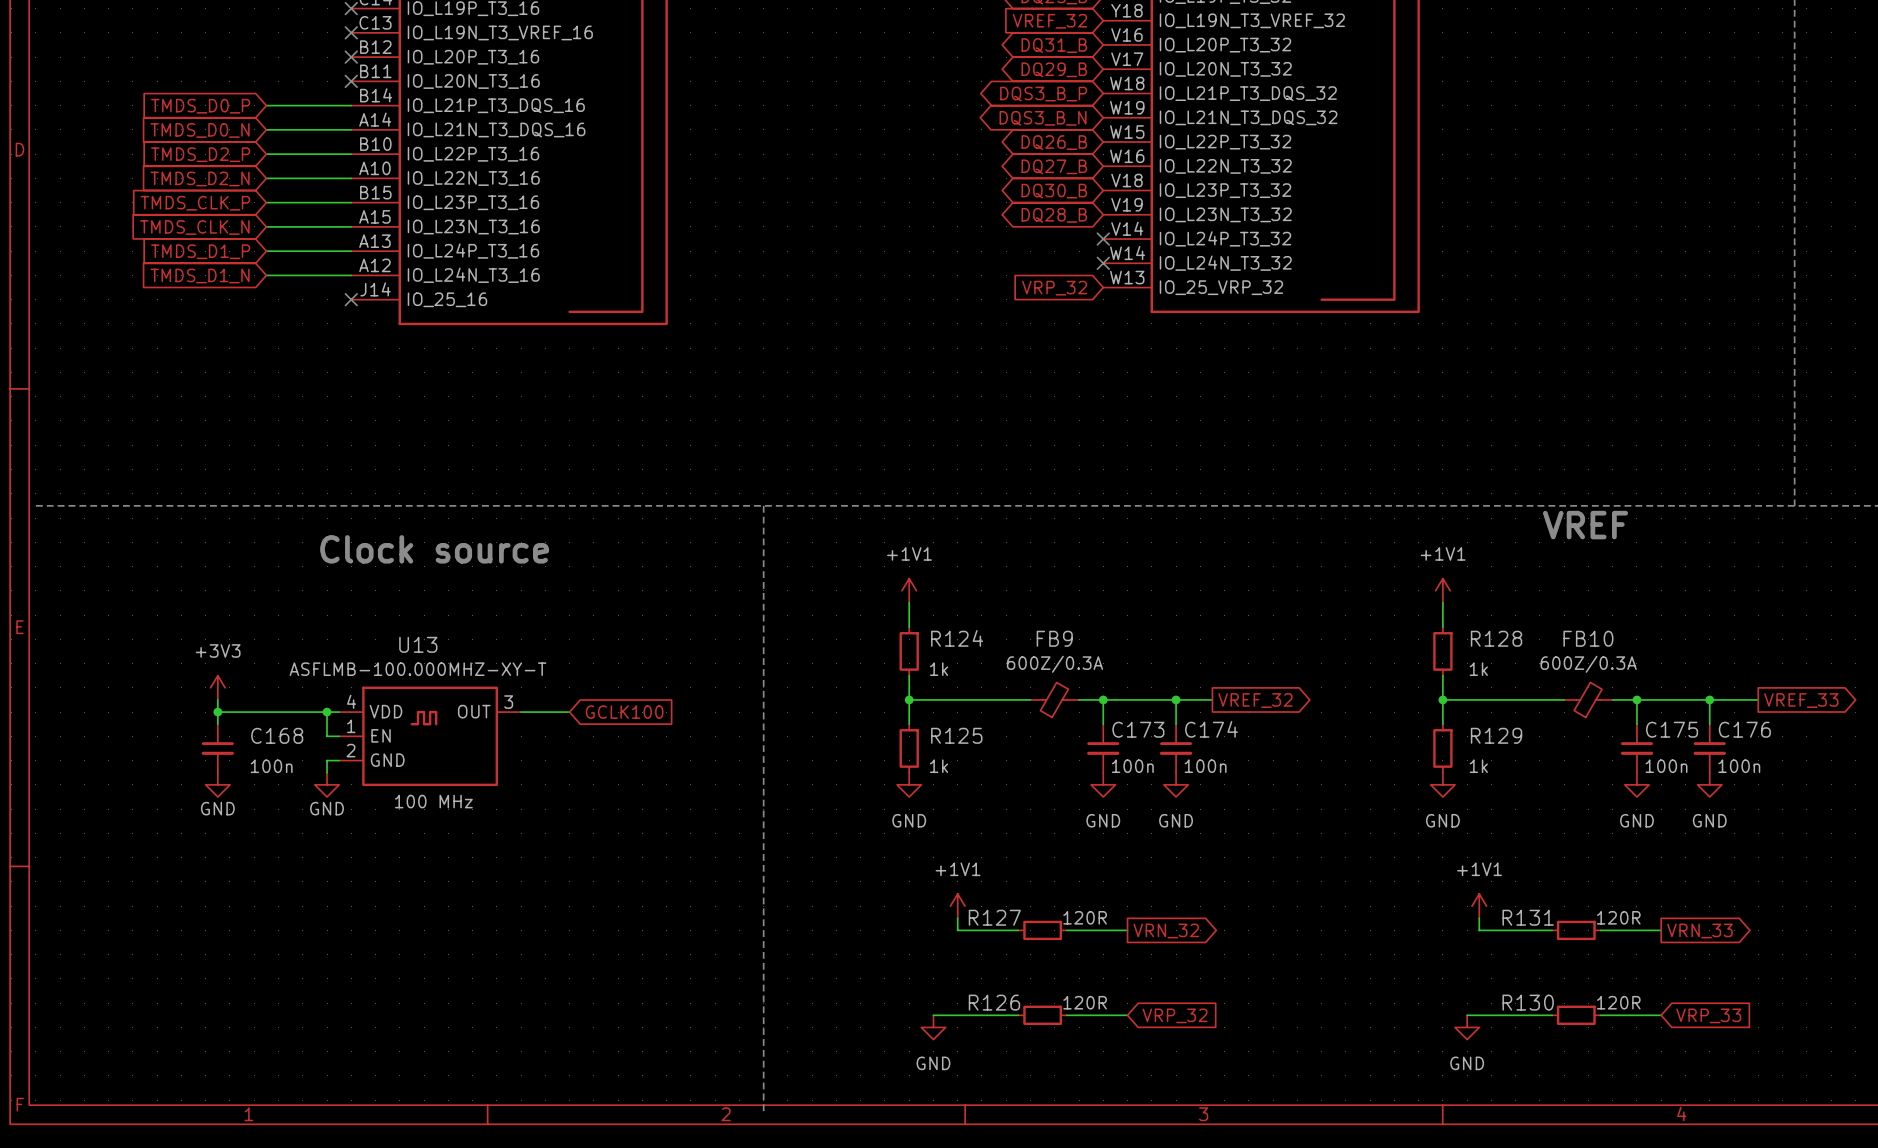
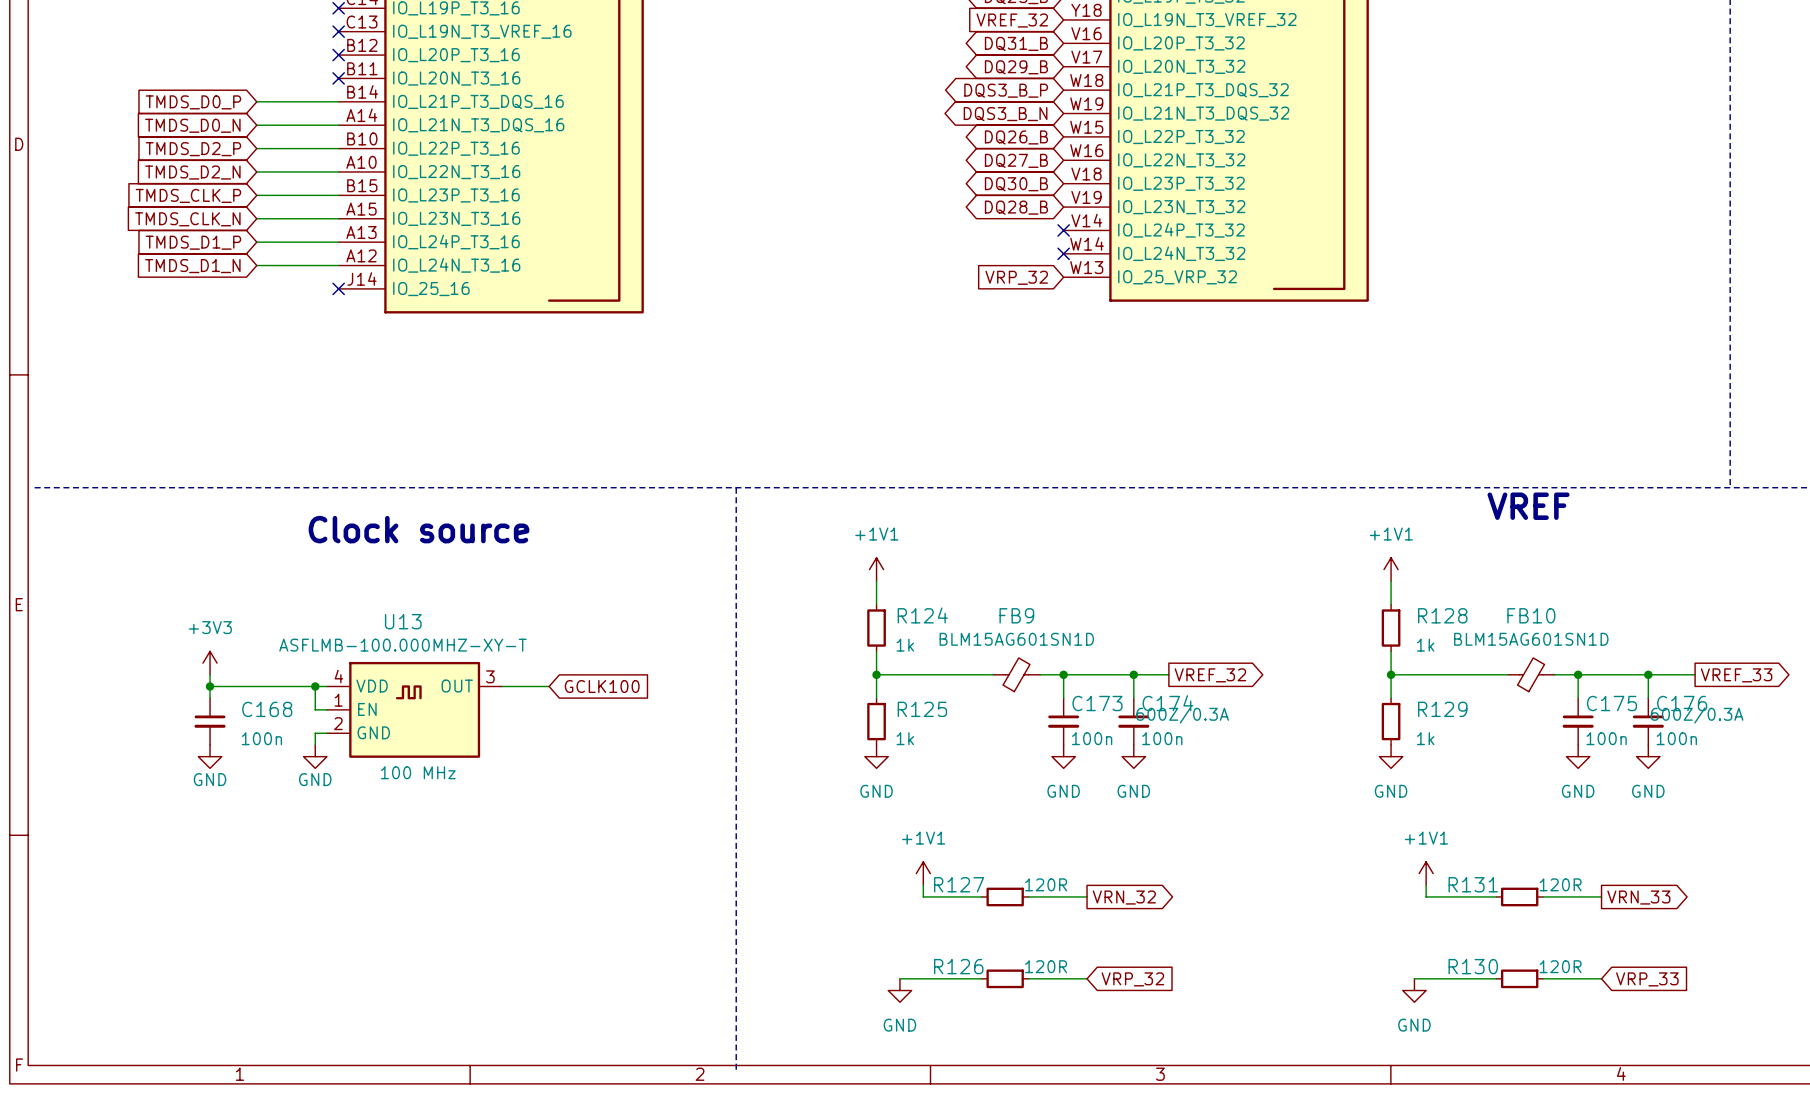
FB9 text: none -> BLM15AG601SN1D (1016, 639)
FB10 text: none -> BLM15AG601SN1D (1531, 639)
FB9 text position: 600Z/0.3A (1054, 664) -> 600Z/0.3A (1182, 715)
FB10 text position: 600Z/0.3A (1588, 664) -> 600Z/0.3A (1697, 715)

